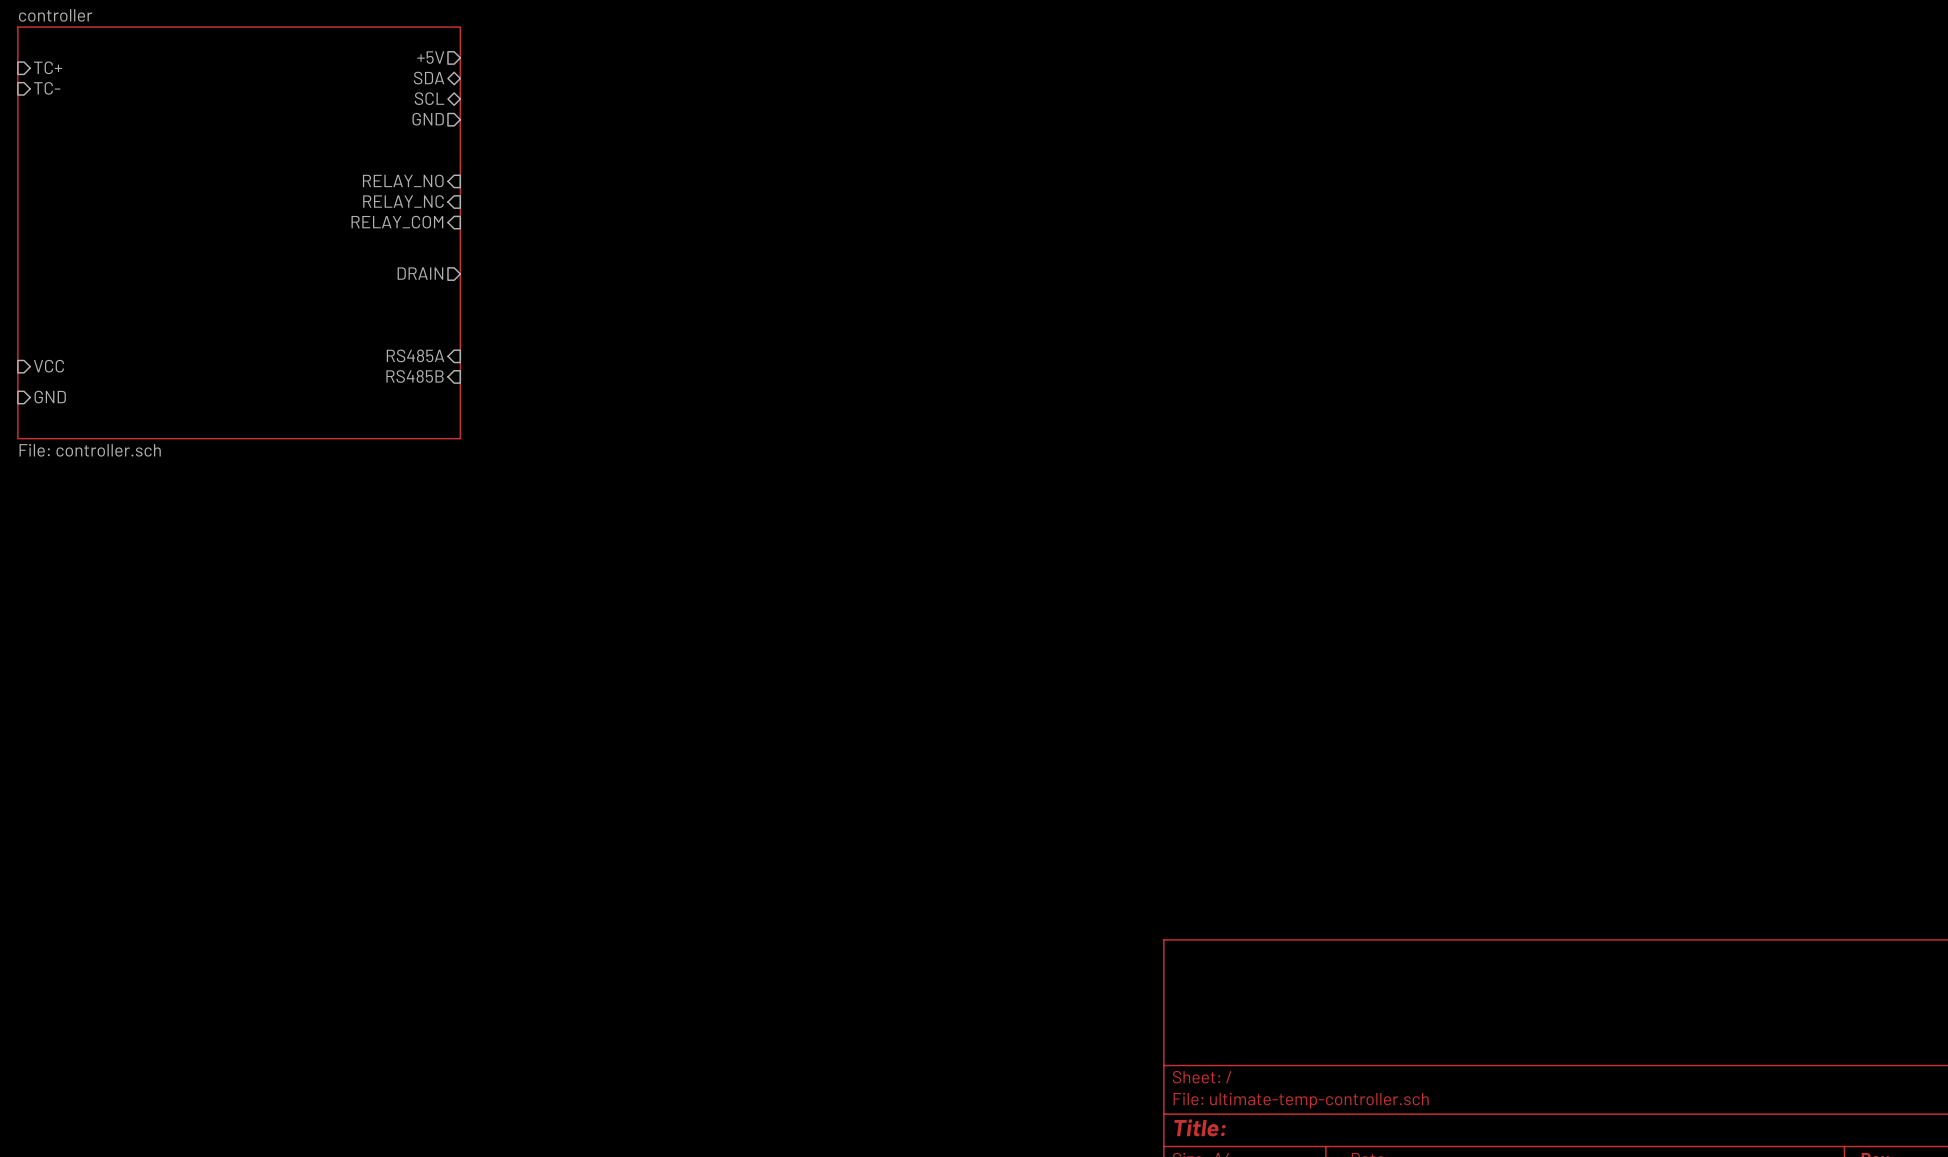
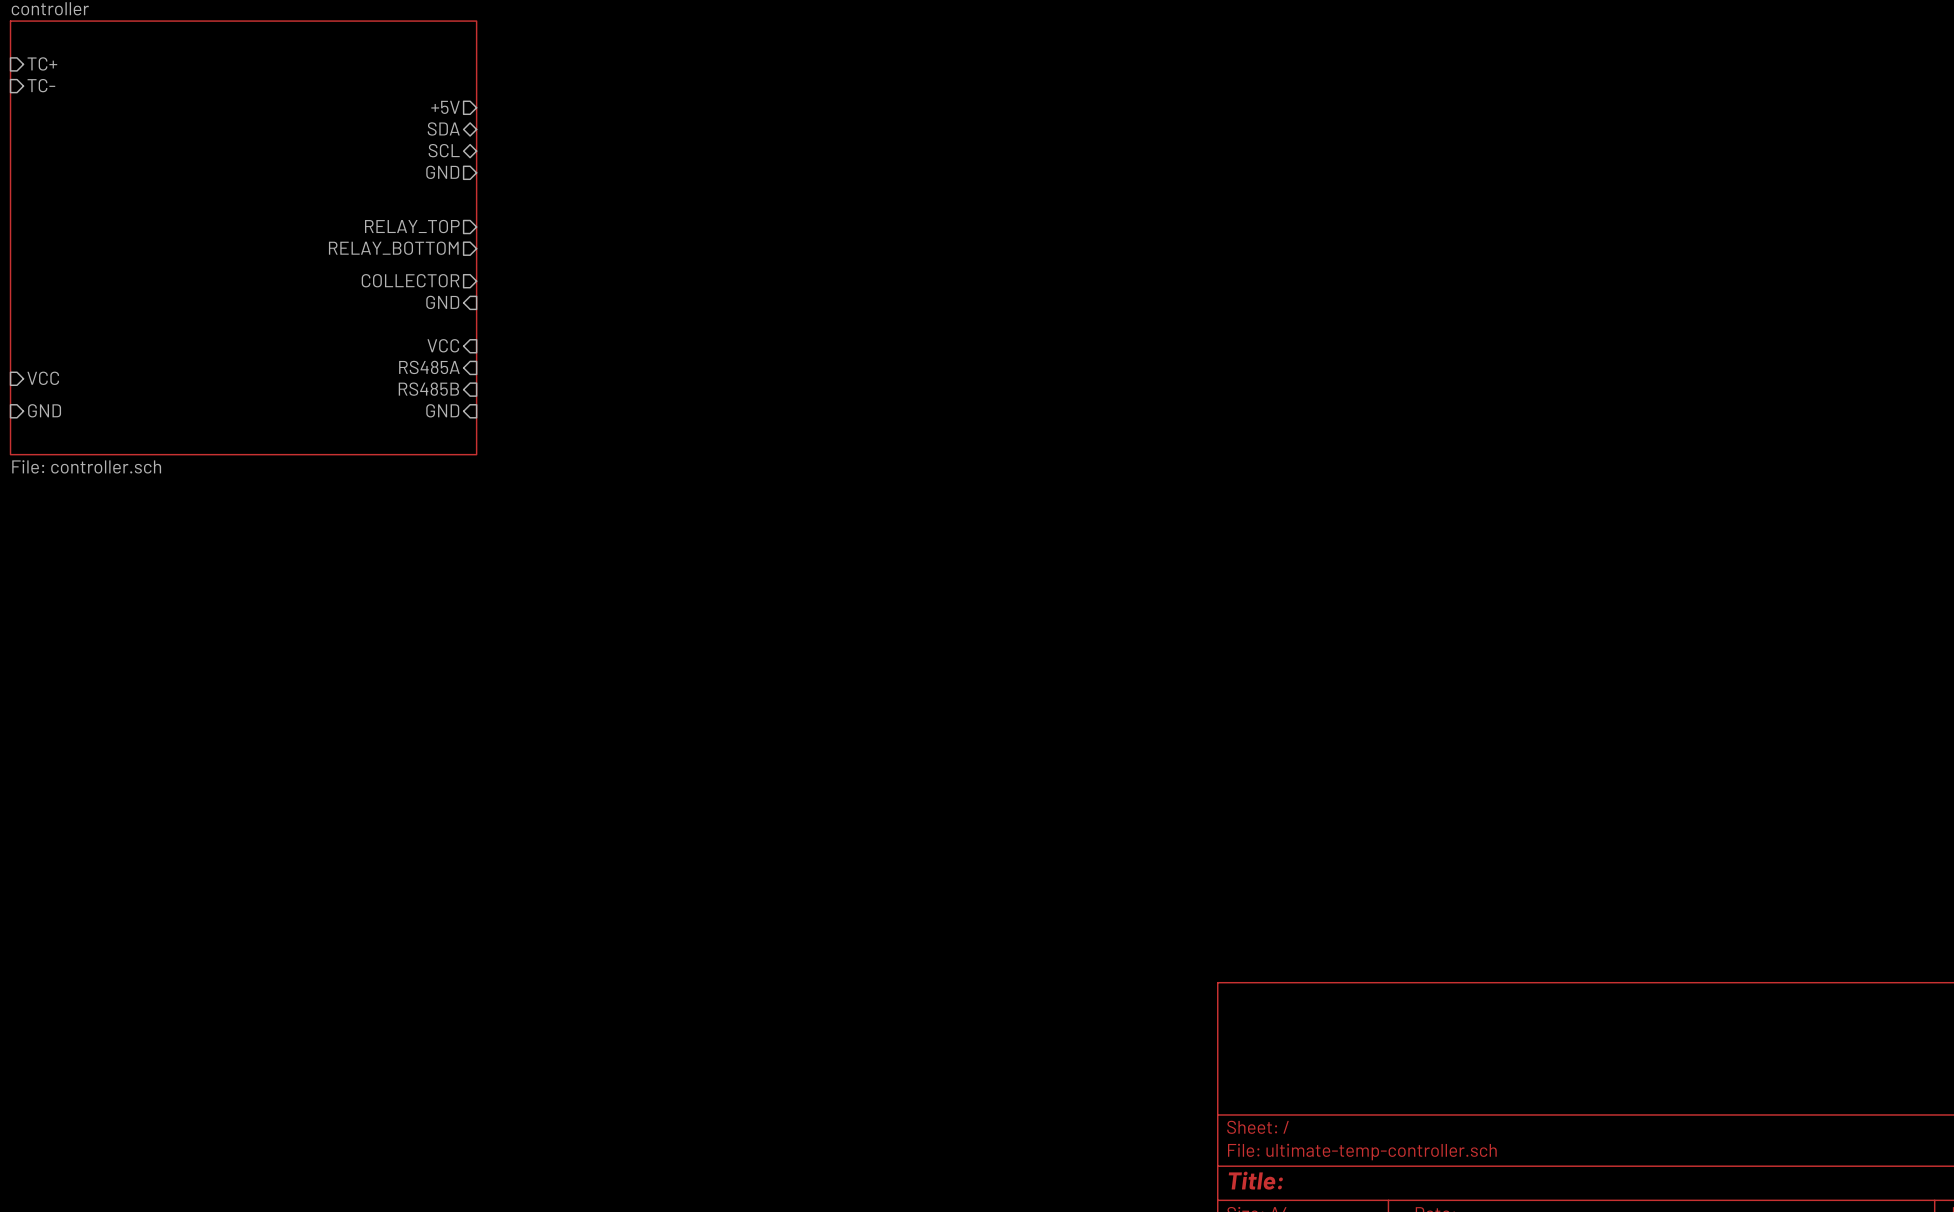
sheet pin position: +5V (430, 57) -> +5V (445, 107)
sheet pin position: SDA (429, 78) -> SDA (443, 128)
sheet pin position: SCL (429, 98) -> SCL (444, 150)
sheet pin position: GND (428, 119) -> GND (442, 172)
sheet pin: RELAY_NO (403, 180) -> none
sheet pin: RELAY_NC (403, 201) -> none
sheet pin shape: input (397, 222) -> output (412, 226)
sheet pin: RELAY_COM (397, 222) -> RELAY_TOP (412, 226)
sheet pin: none -> RELAY_BOTTOM (393, 248)
sheet pin: DRAIN (420, 273) -> COLLECTOR (410, 280)
sheet pin: none -> GND (442, 302)
sheet pin: none -> VCC (443, 345)
sheet pin: none -> GND (442, 410)

